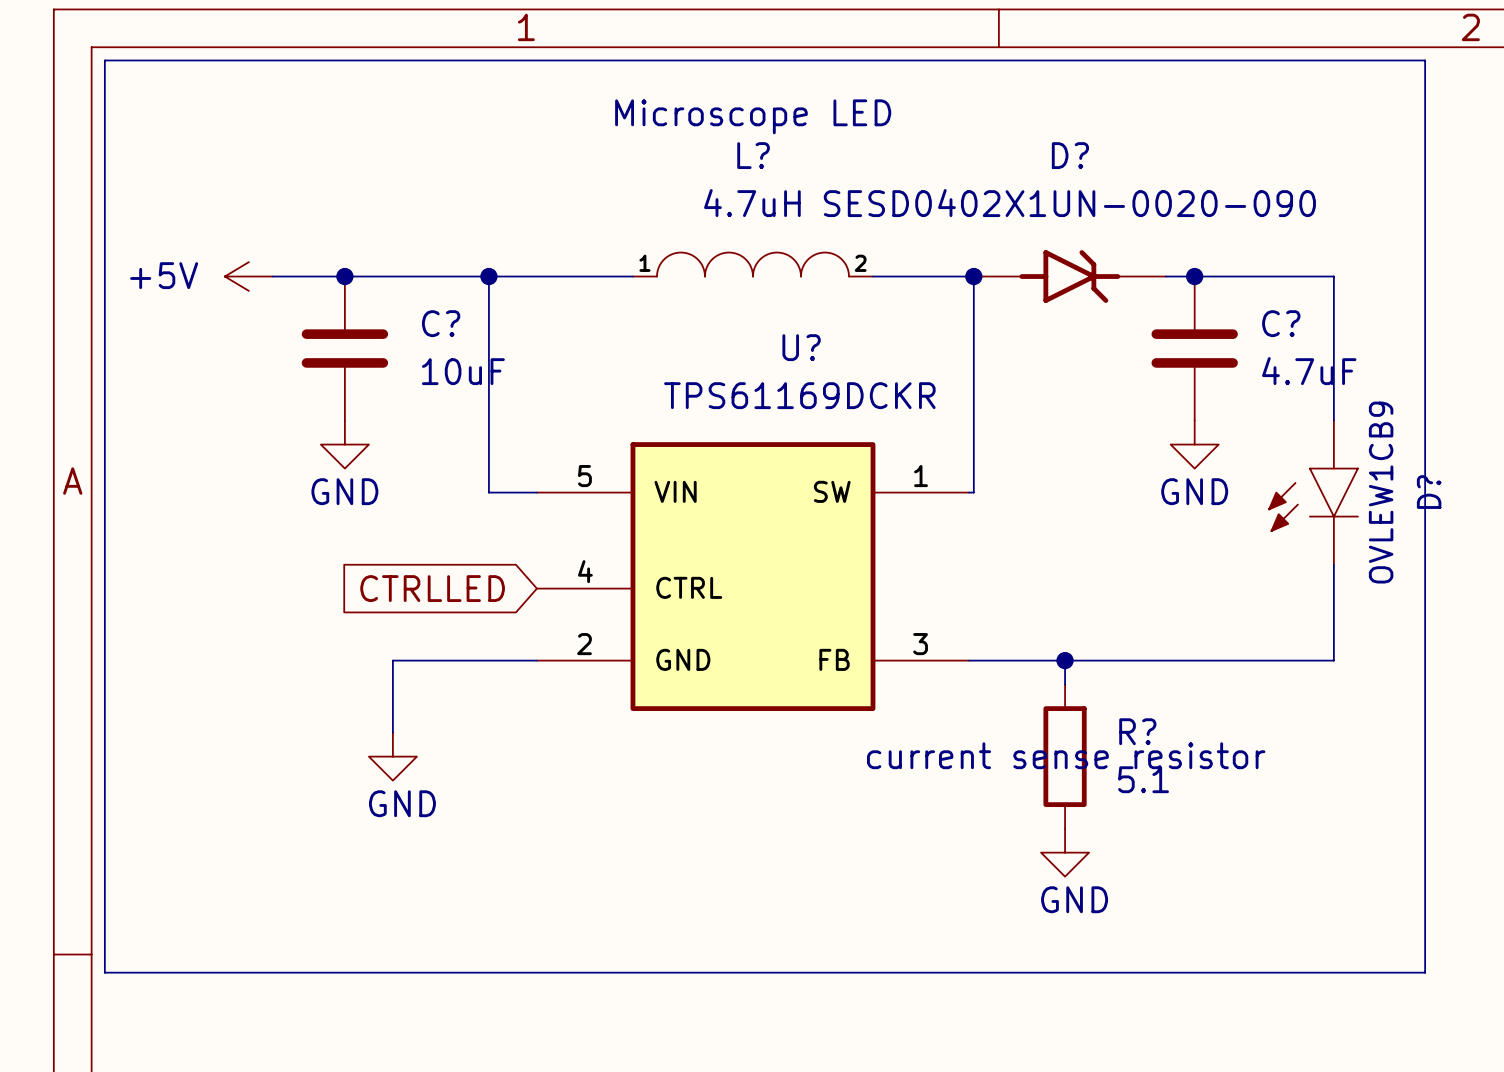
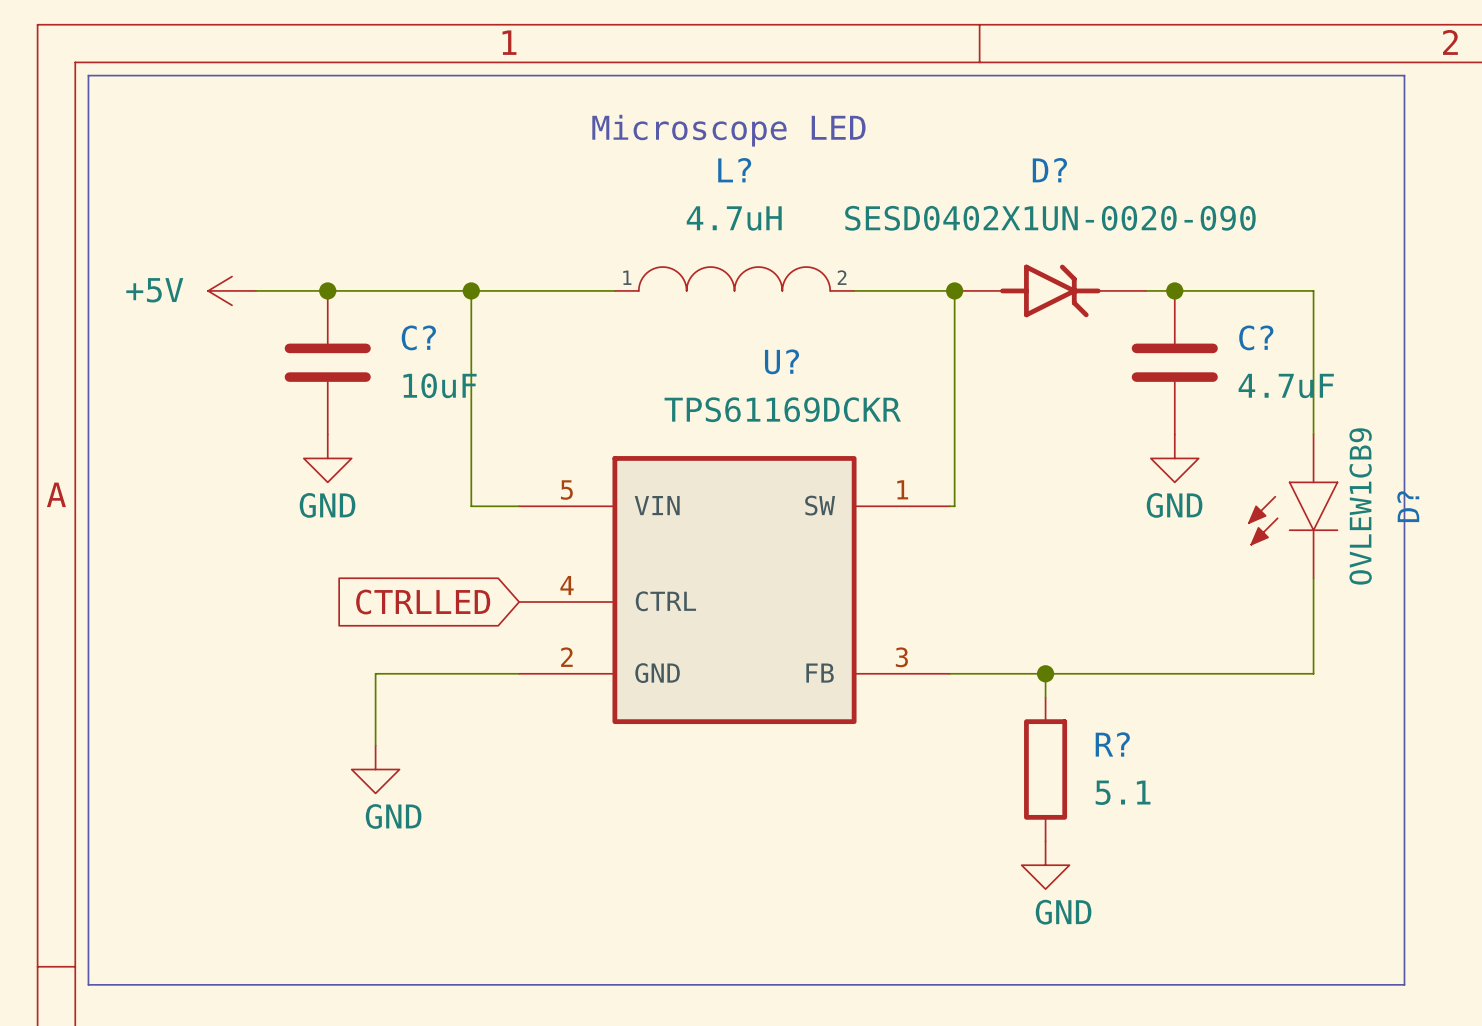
R? text: current sense resistor (1066, 755) -> none

